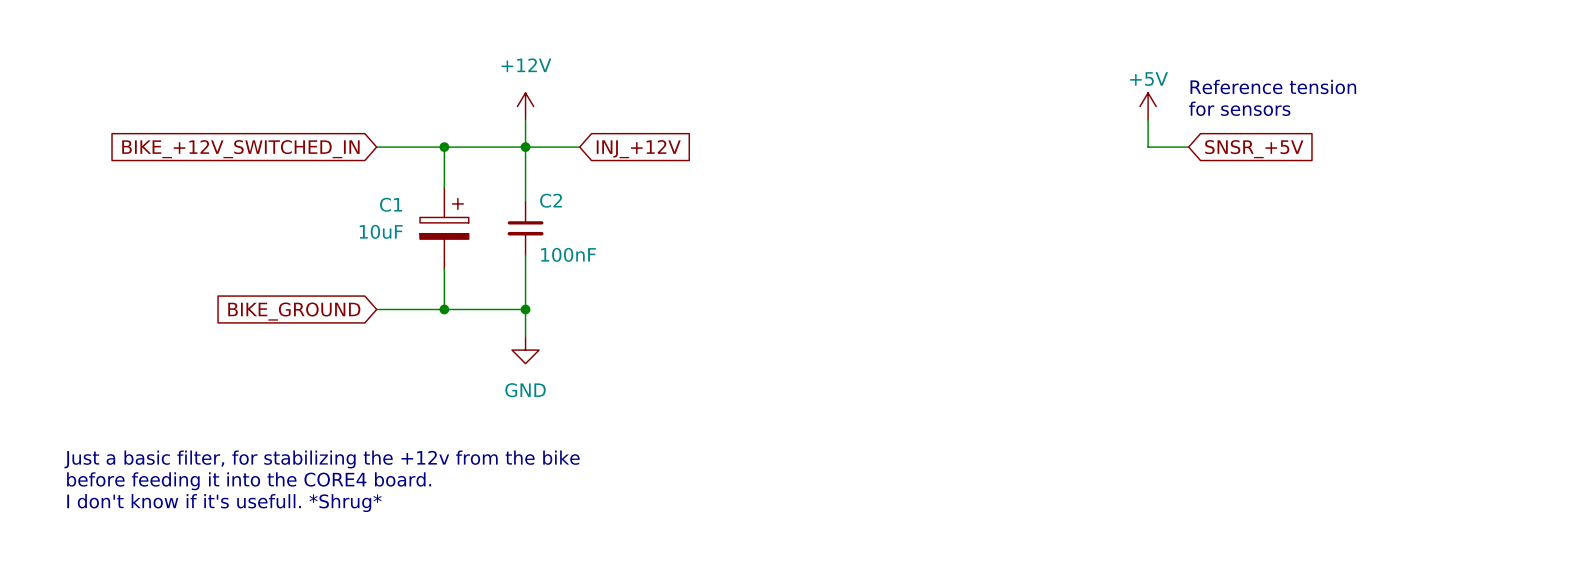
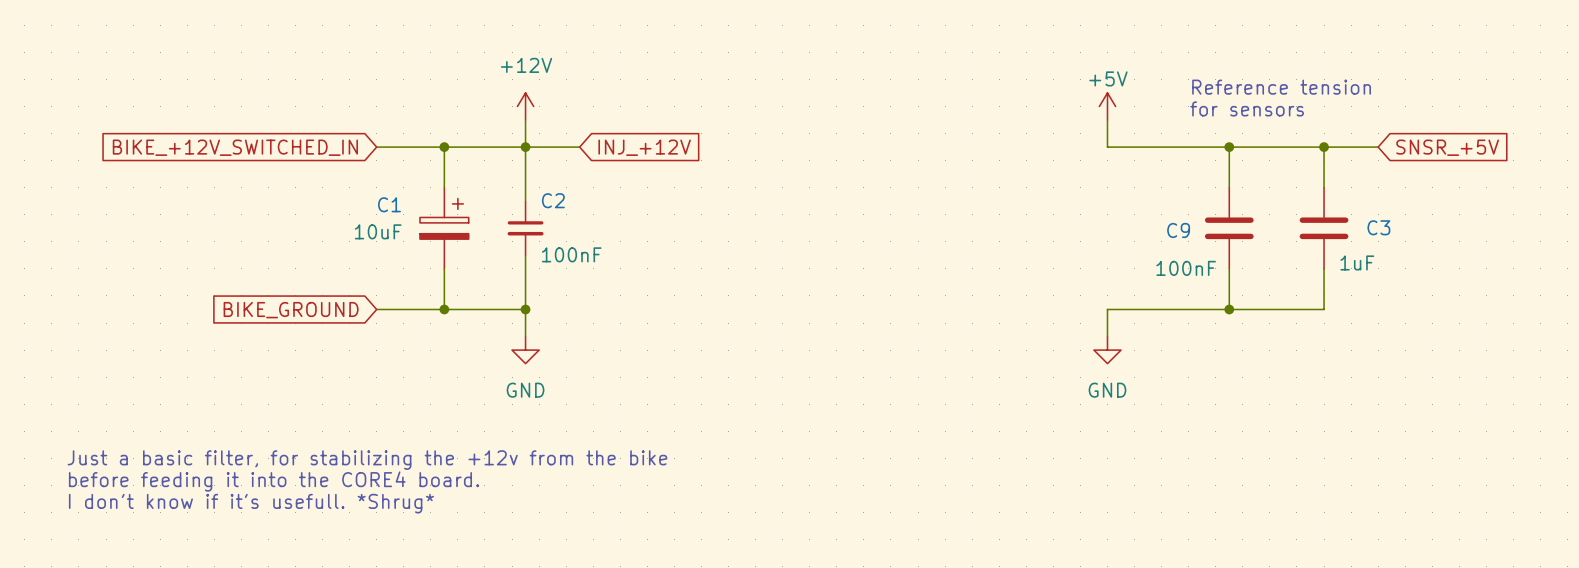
power symbol position: +5V (1148, 106) -> +5V (1107, 106)
wire: (1148, 120) (1148, 147) -> (1107, 120) (1107, 147) (1148, 147)
wire: none -> (1188, 147) (1378, 147)
wire: none -> (1229, 147) (1229, 187)
junction: none -> (1229, 147)
wire: none -> (1324, 147) (1324, 187)
junction: none -> (1324, 147)
global label position: SNSR_+5V (1254, 149) -> SNSR_+5V (1447, 147)
C9: none -> 100nF (1229, 228)
C3: none -> 1uF (1324, 228)
wire: none -> (1229, 268) (1229, 309)
wire: none -> (1324, 268) (1324, 309) (1107, 309) (1107, 336)
junction: none -> (1229, 309)
power symbol: none -> GND (1107, 350)

